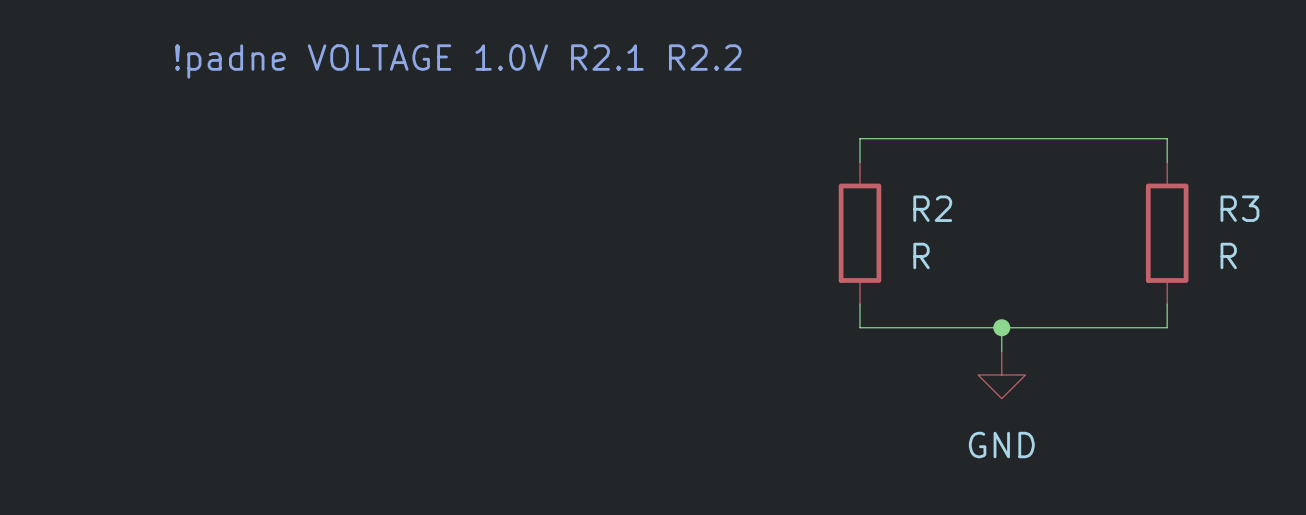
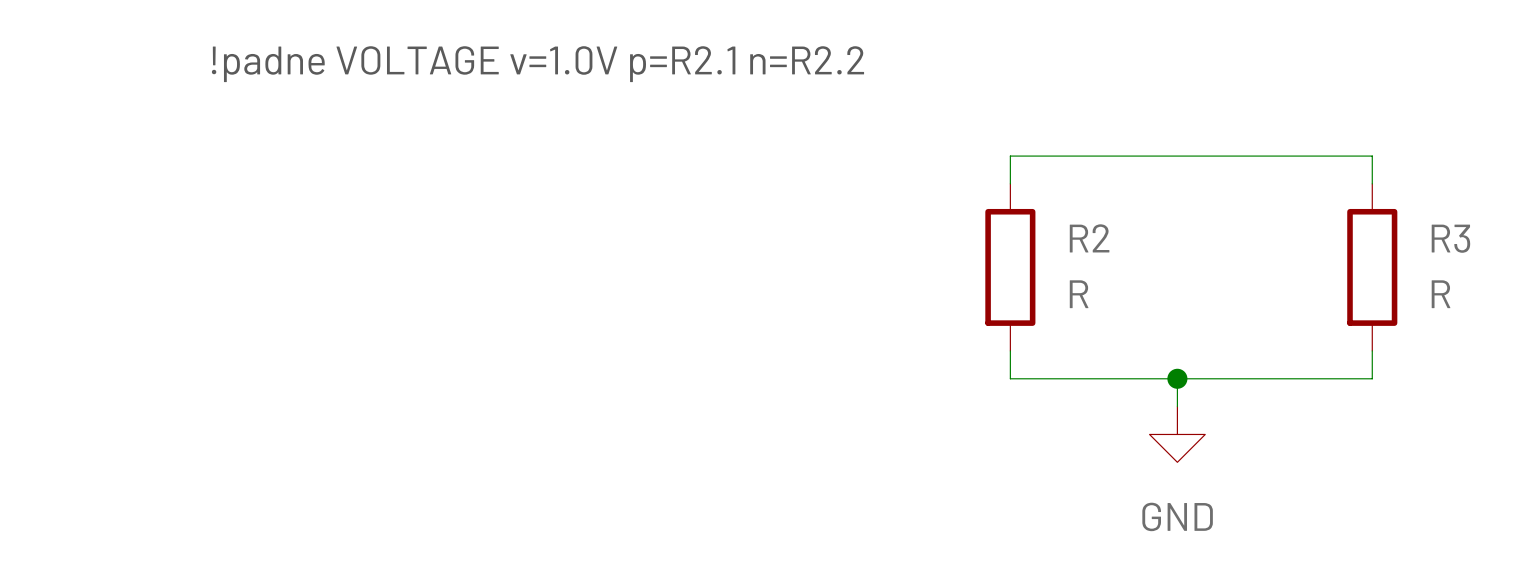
text: !padne VOLTAGE 1.0V R2.1 R2.2 (458, 61) -> !padne VOLTAGE v=1.0V p=R2.1 n=R2.2 (537, 64)

